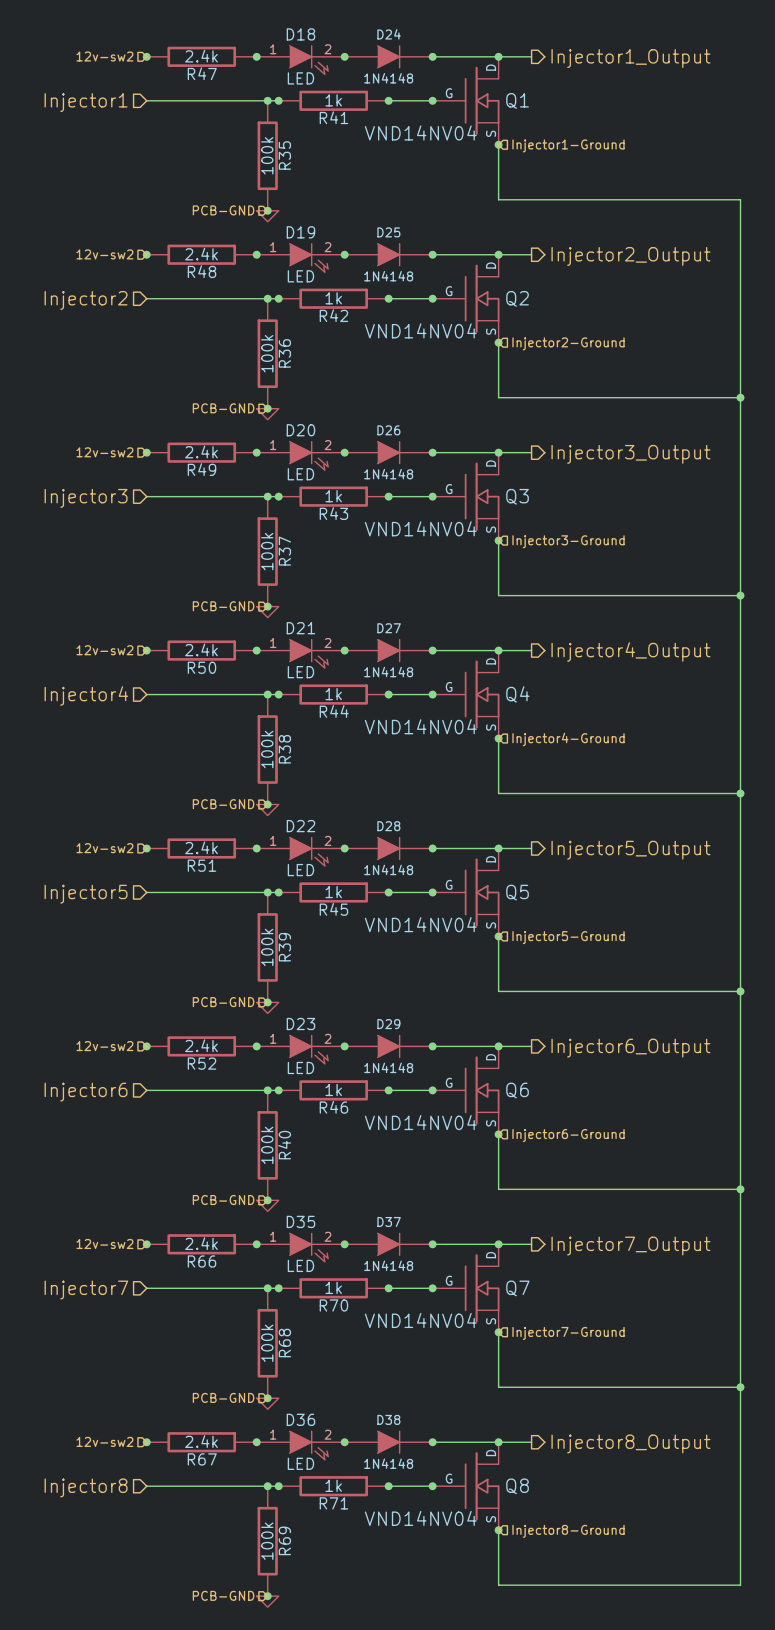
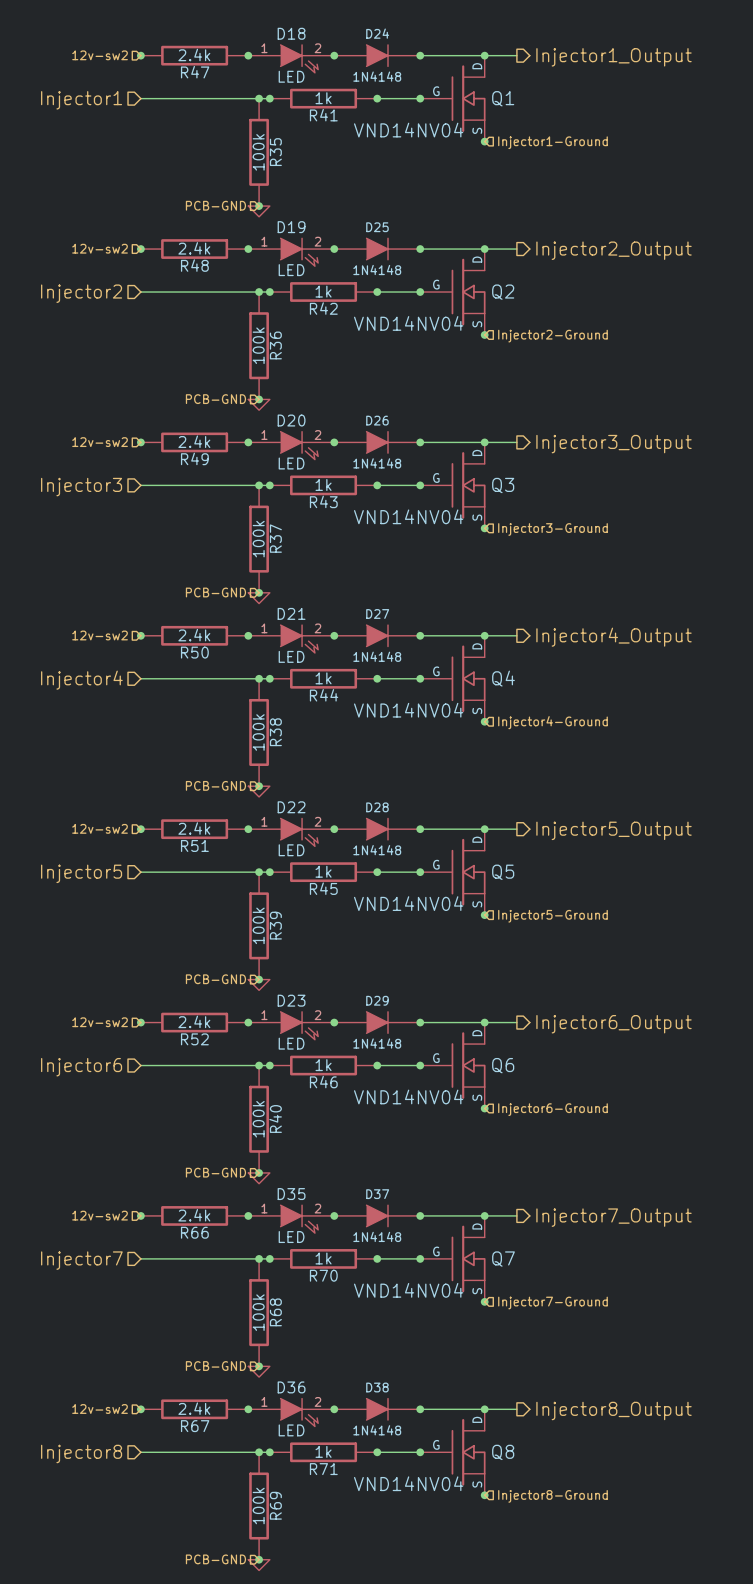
wire: (498, 144) (498, 199) (740, 199) (740, 1585) (498, 1585) (498, 1530) -> none
wire: (498, 342) (498, 397) (740, 397) -> none
junction: (740, 397) -> none
wire: (498, 540) (498, 595) (740, 595) -> none
junction: (740, 595) -> none
wire: (498, 738) (498, 793) (740, 793) -> none
junction: (740, 793) -> none
wire: (498, 936) (498, 991) (740, 991) -> none
junction: (740, 991) -> none
wire: (498, 1134) (498, 1189) (740, 1189) -> none
junction: (740, 1189) -> none
wire: (498, 1332) (498, 1387) (740, 1387) -> none
junction: (740, 1387) -> none

